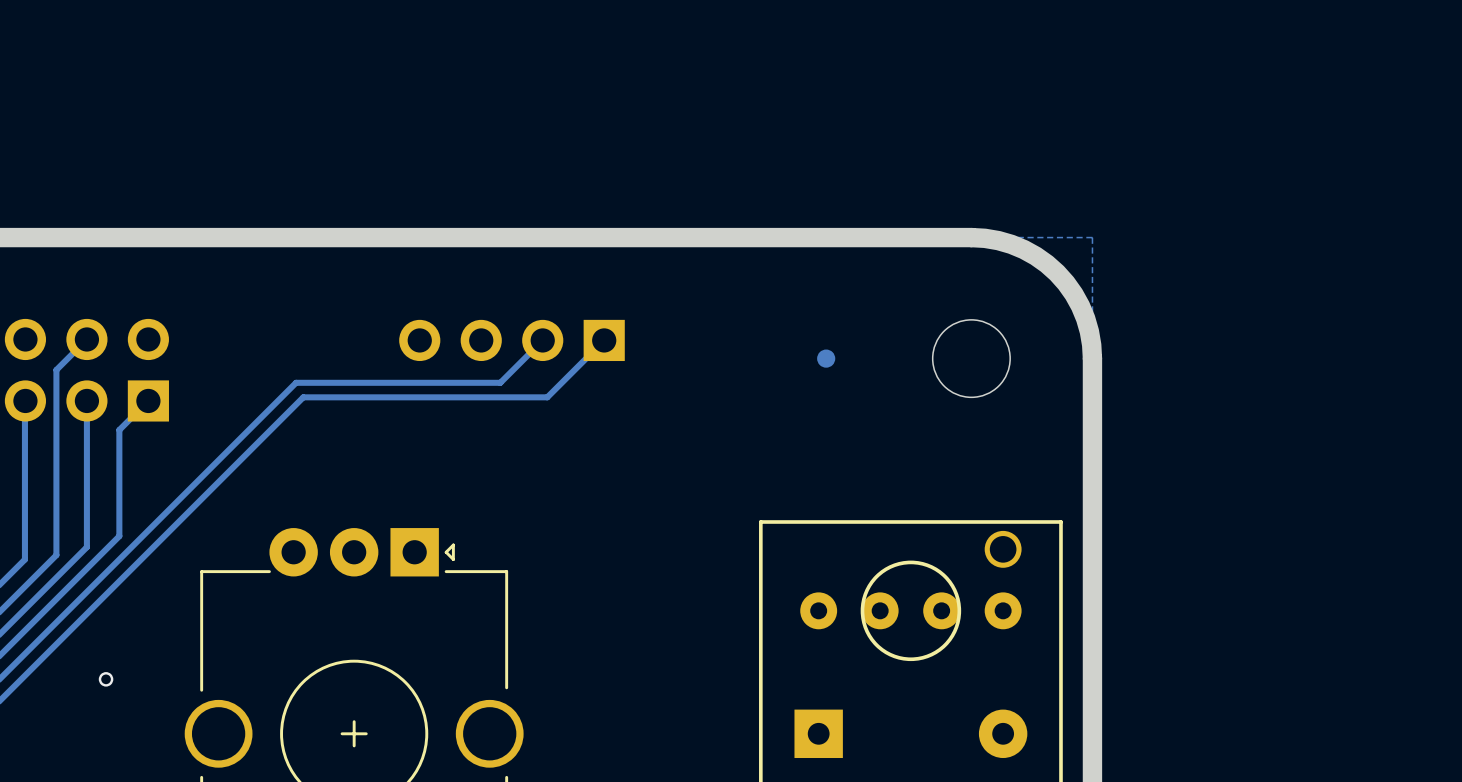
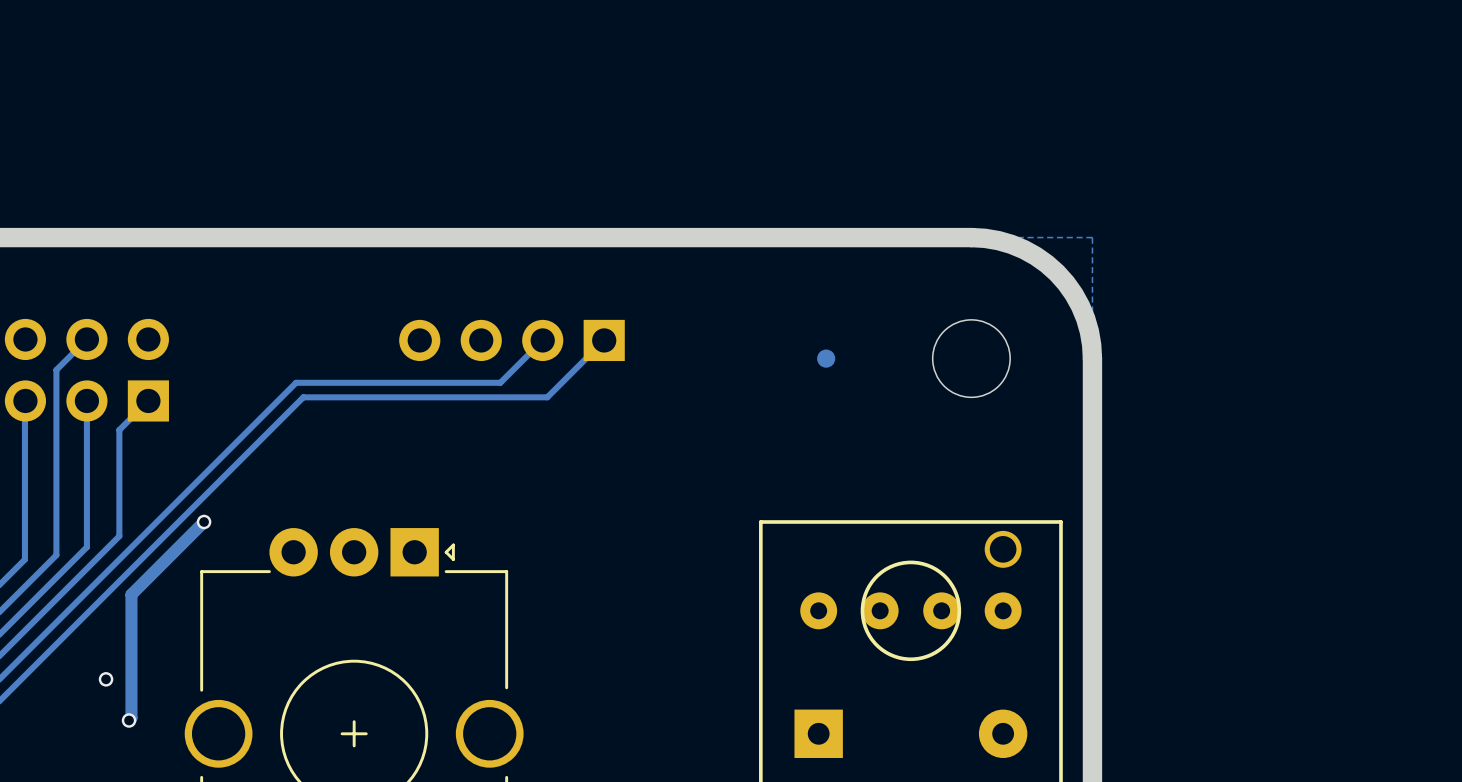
track: none -> (204, 521) (131, 594) (131, 718) (129, 720)
via: none -> (204, 521)
via: none -> (129, 720)

